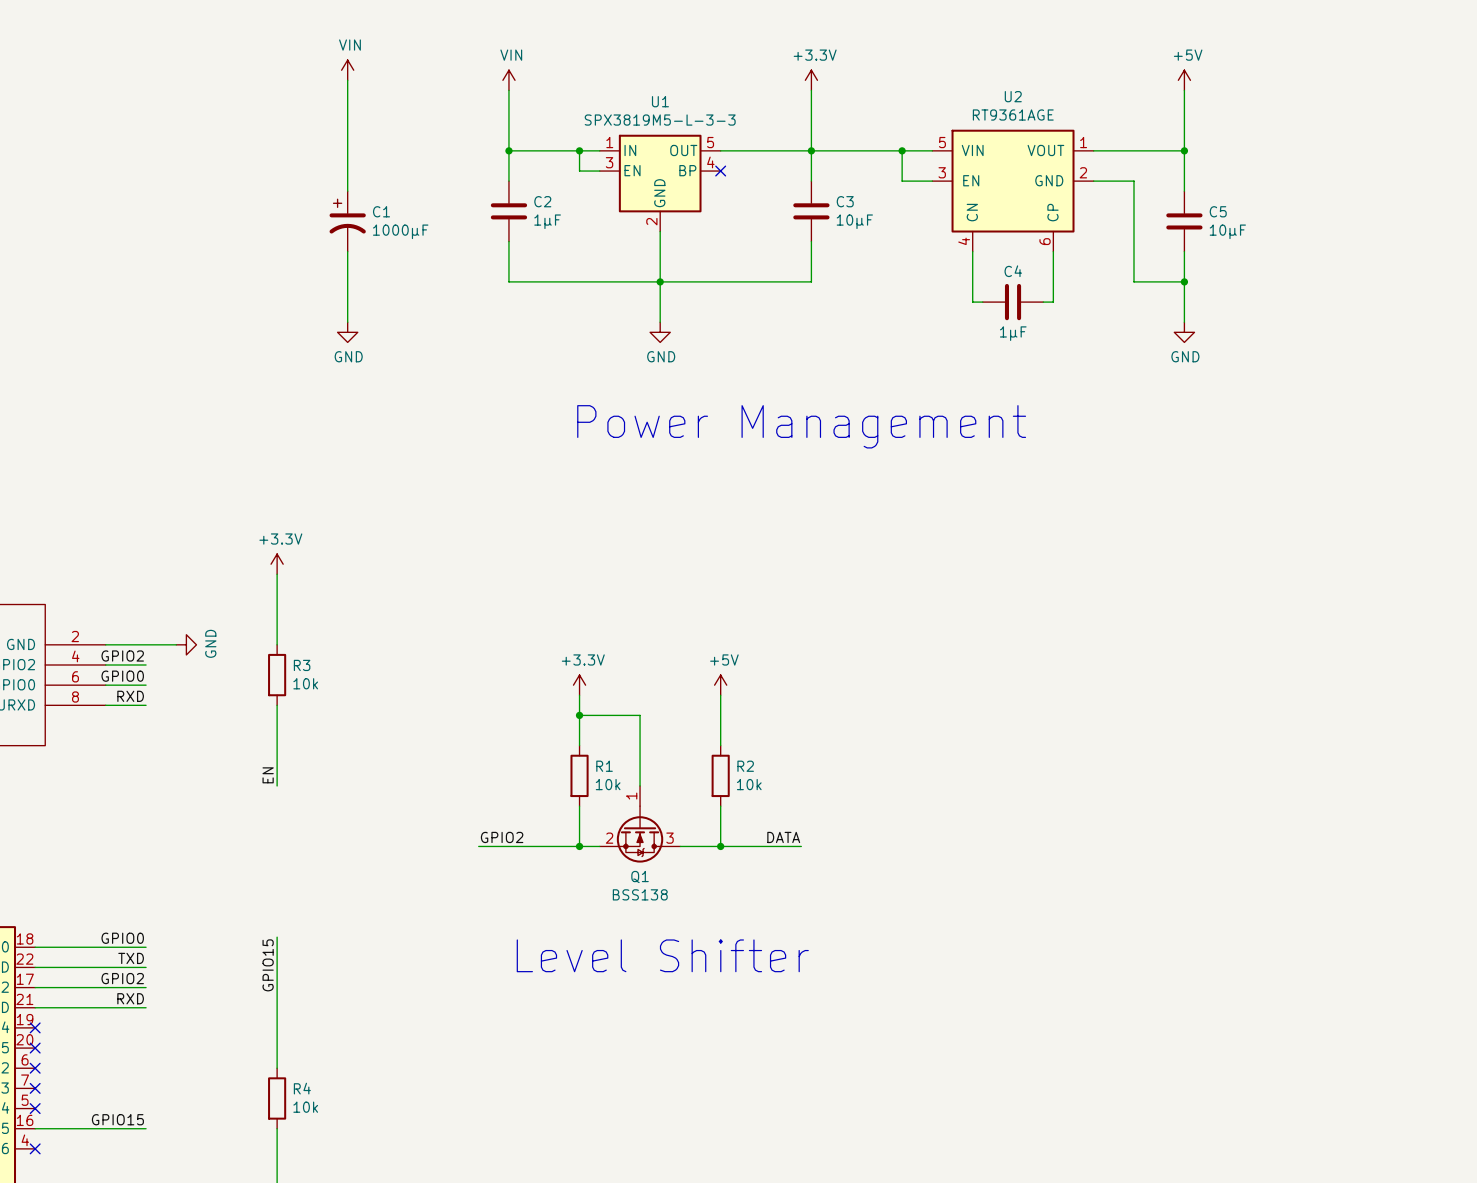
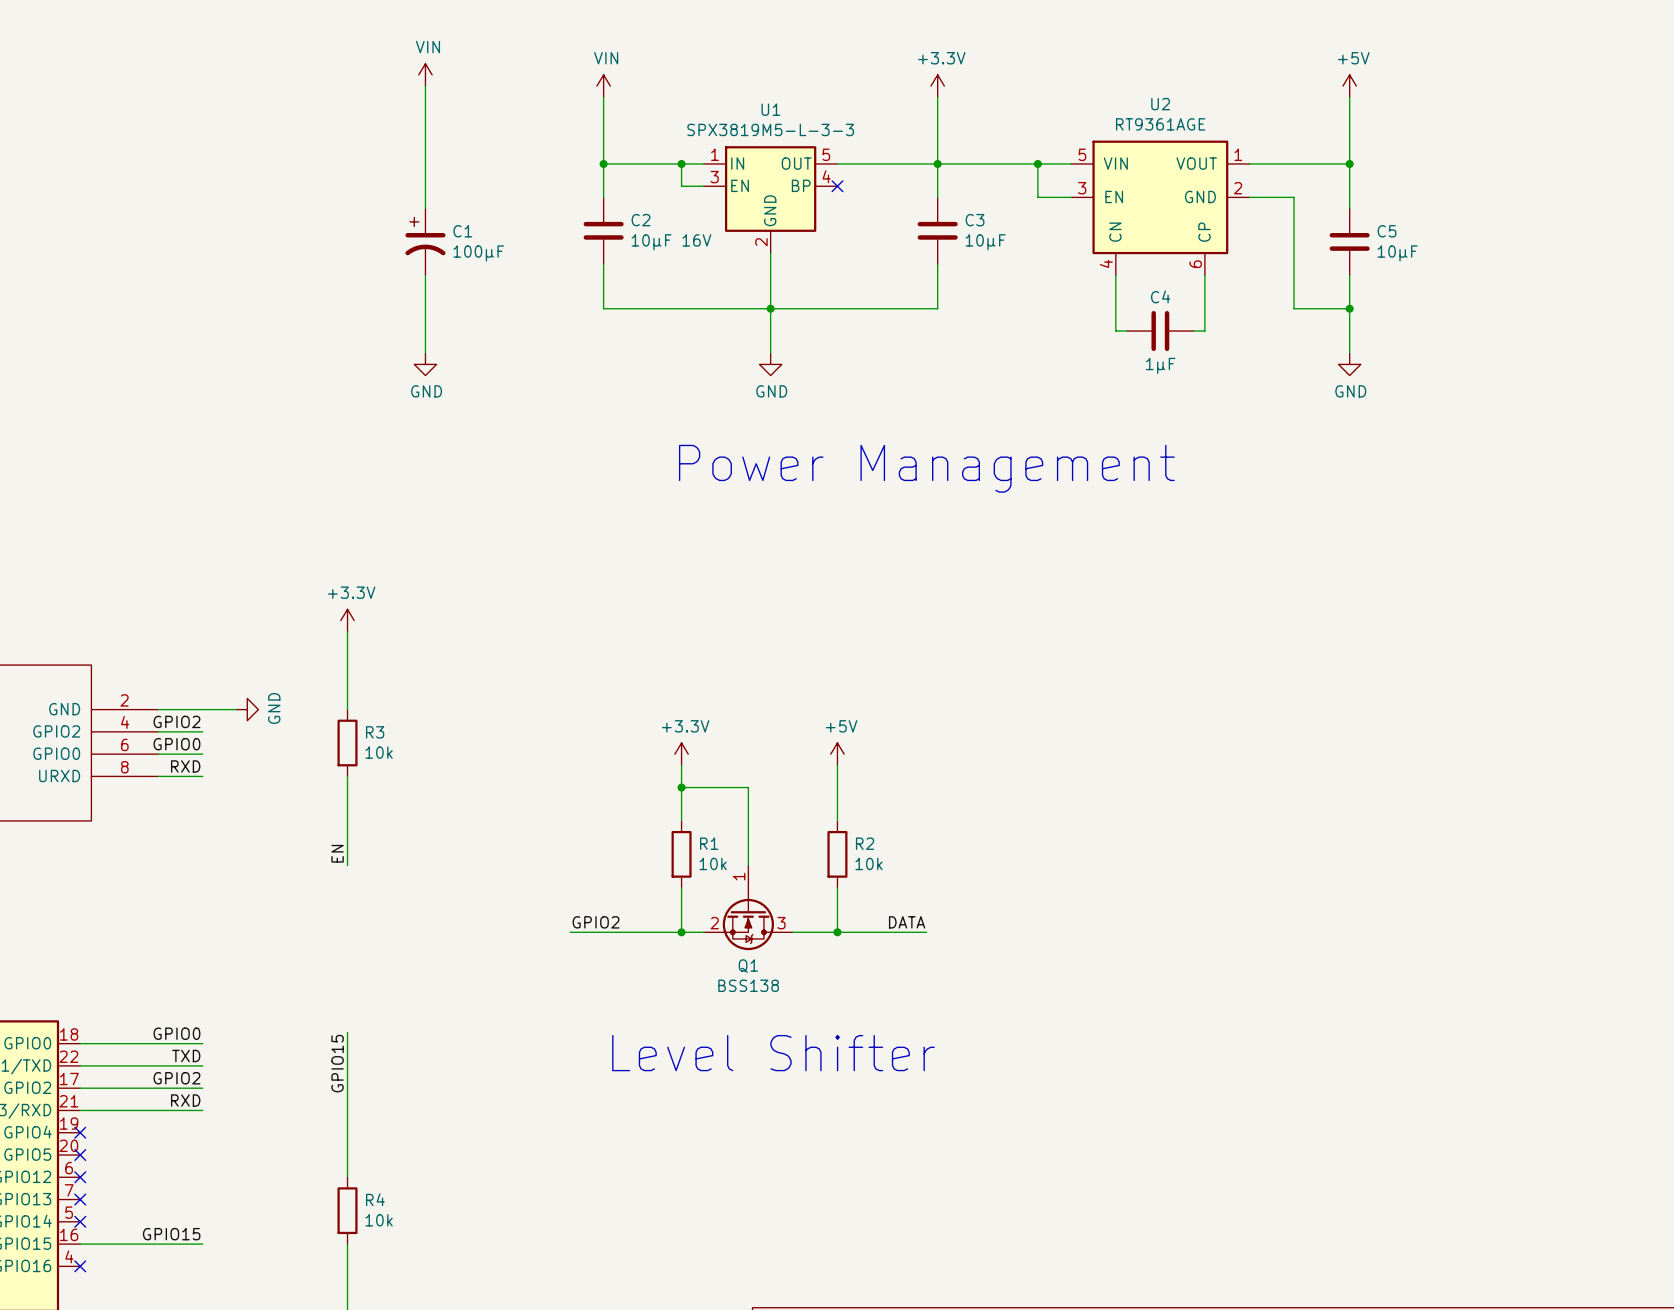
C2 value: 1µF (547, 221) -> 10µF 16V (671, 242)
C1 value: 1000µF (400, 231) -> 100µF (478, 253)

